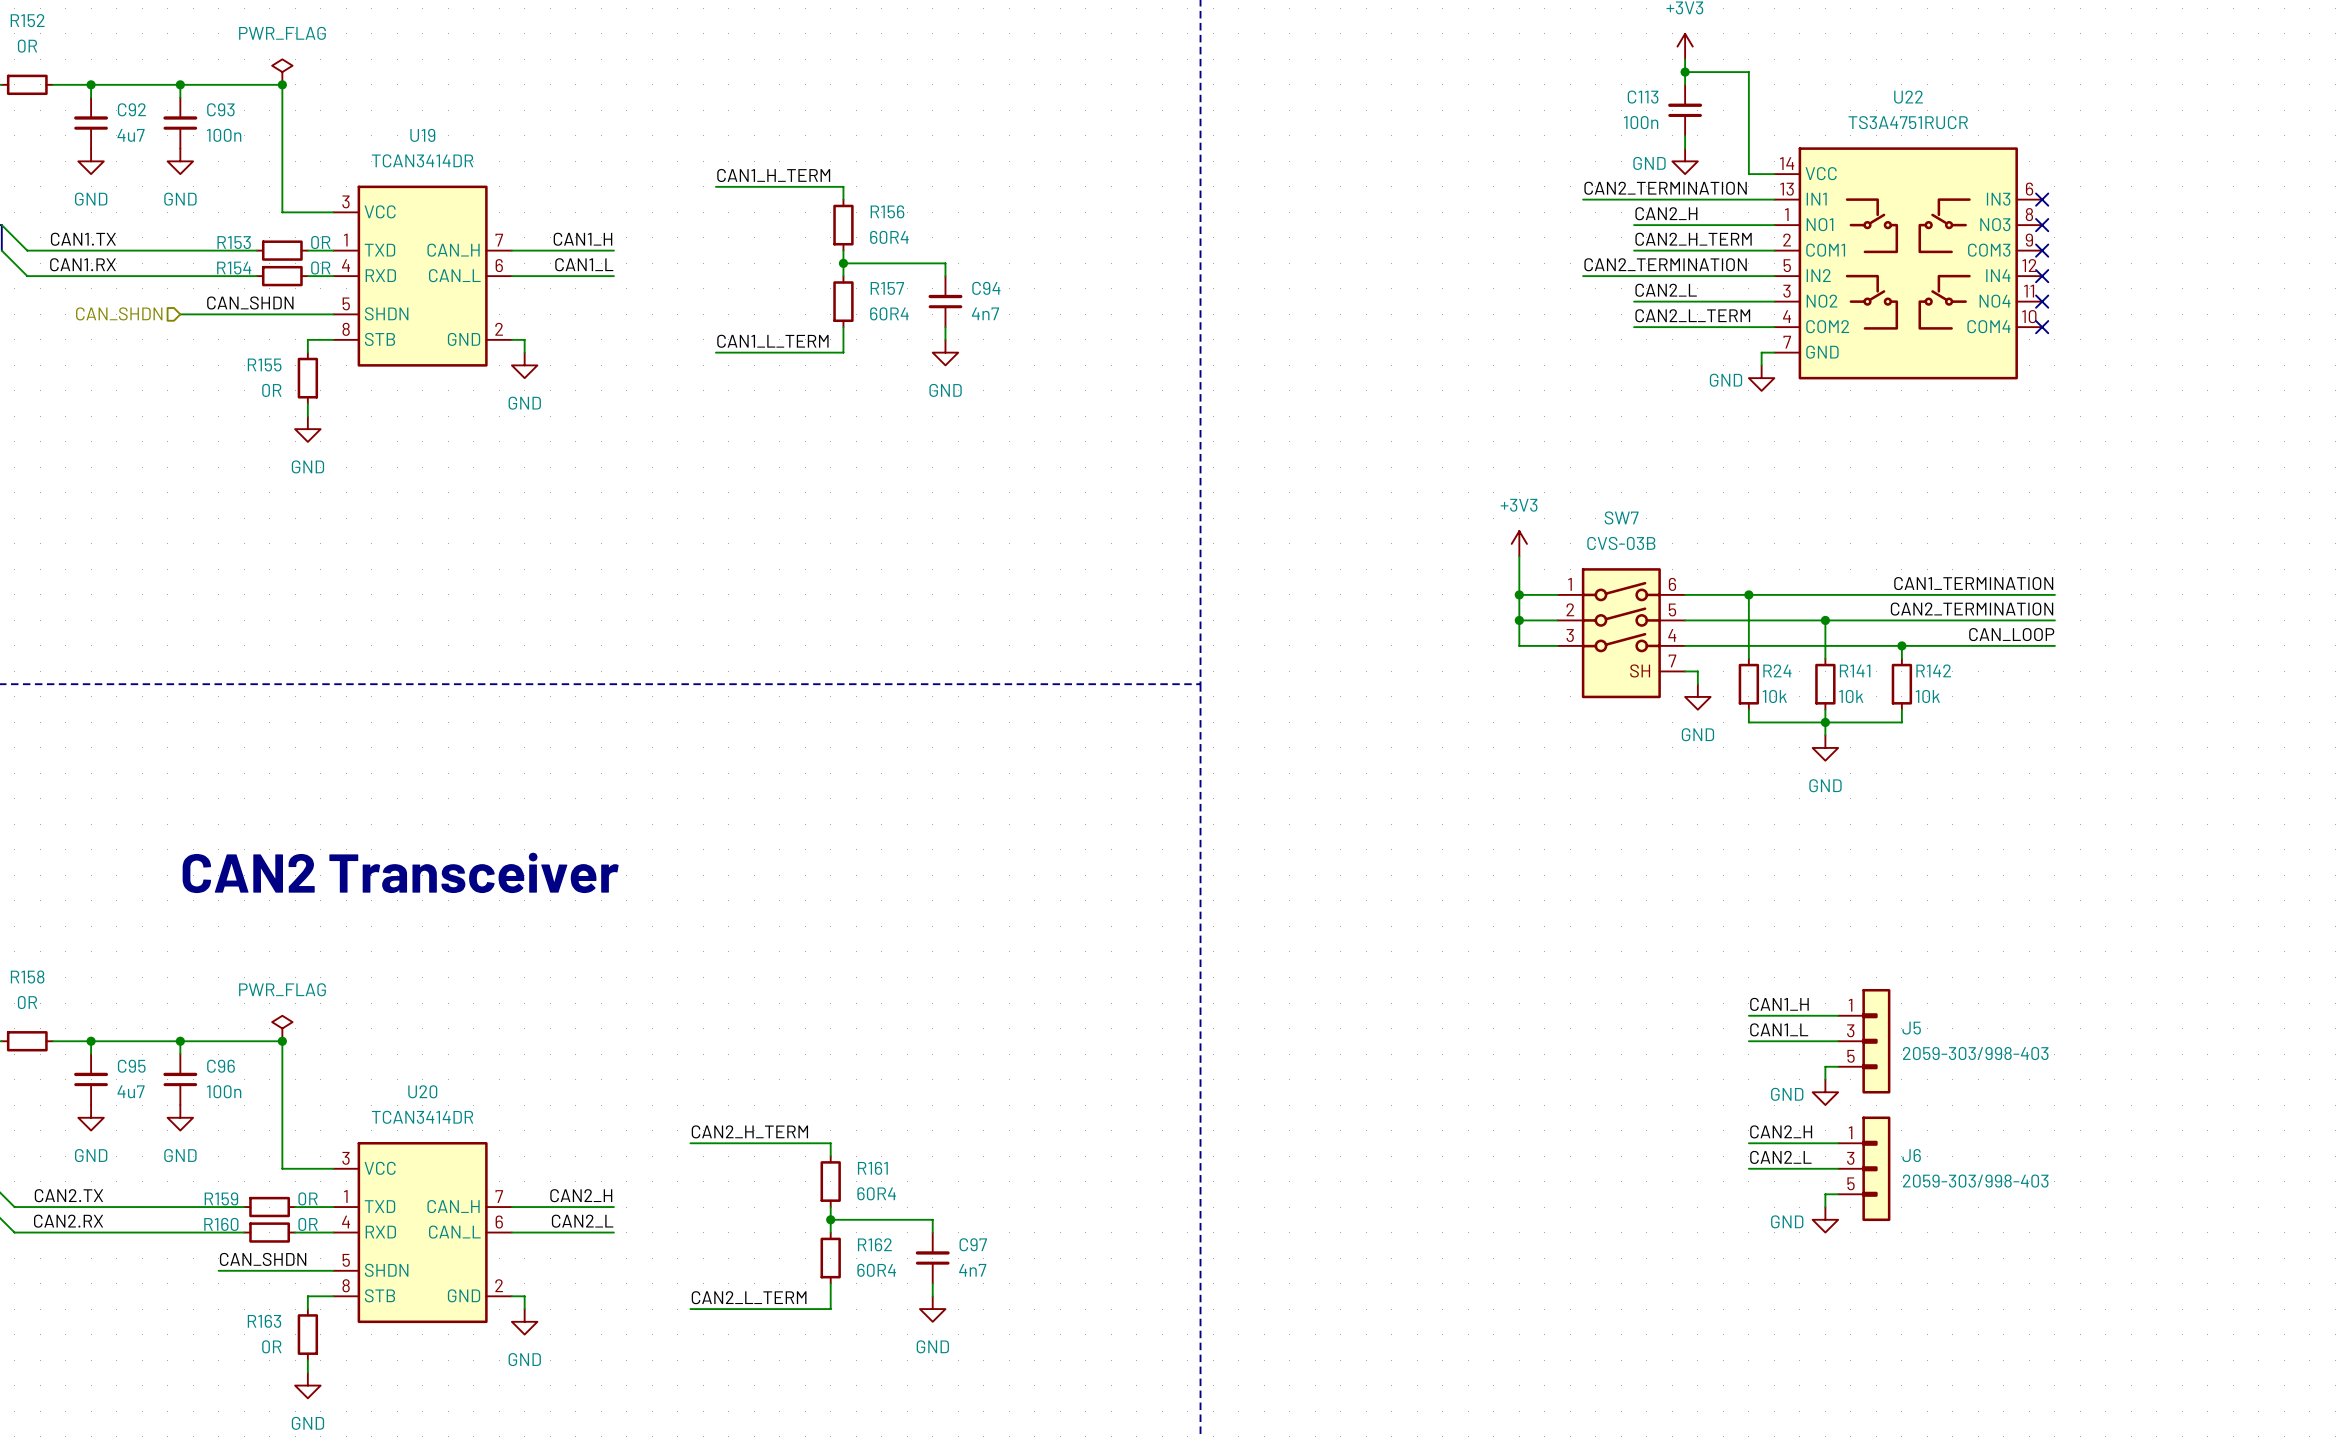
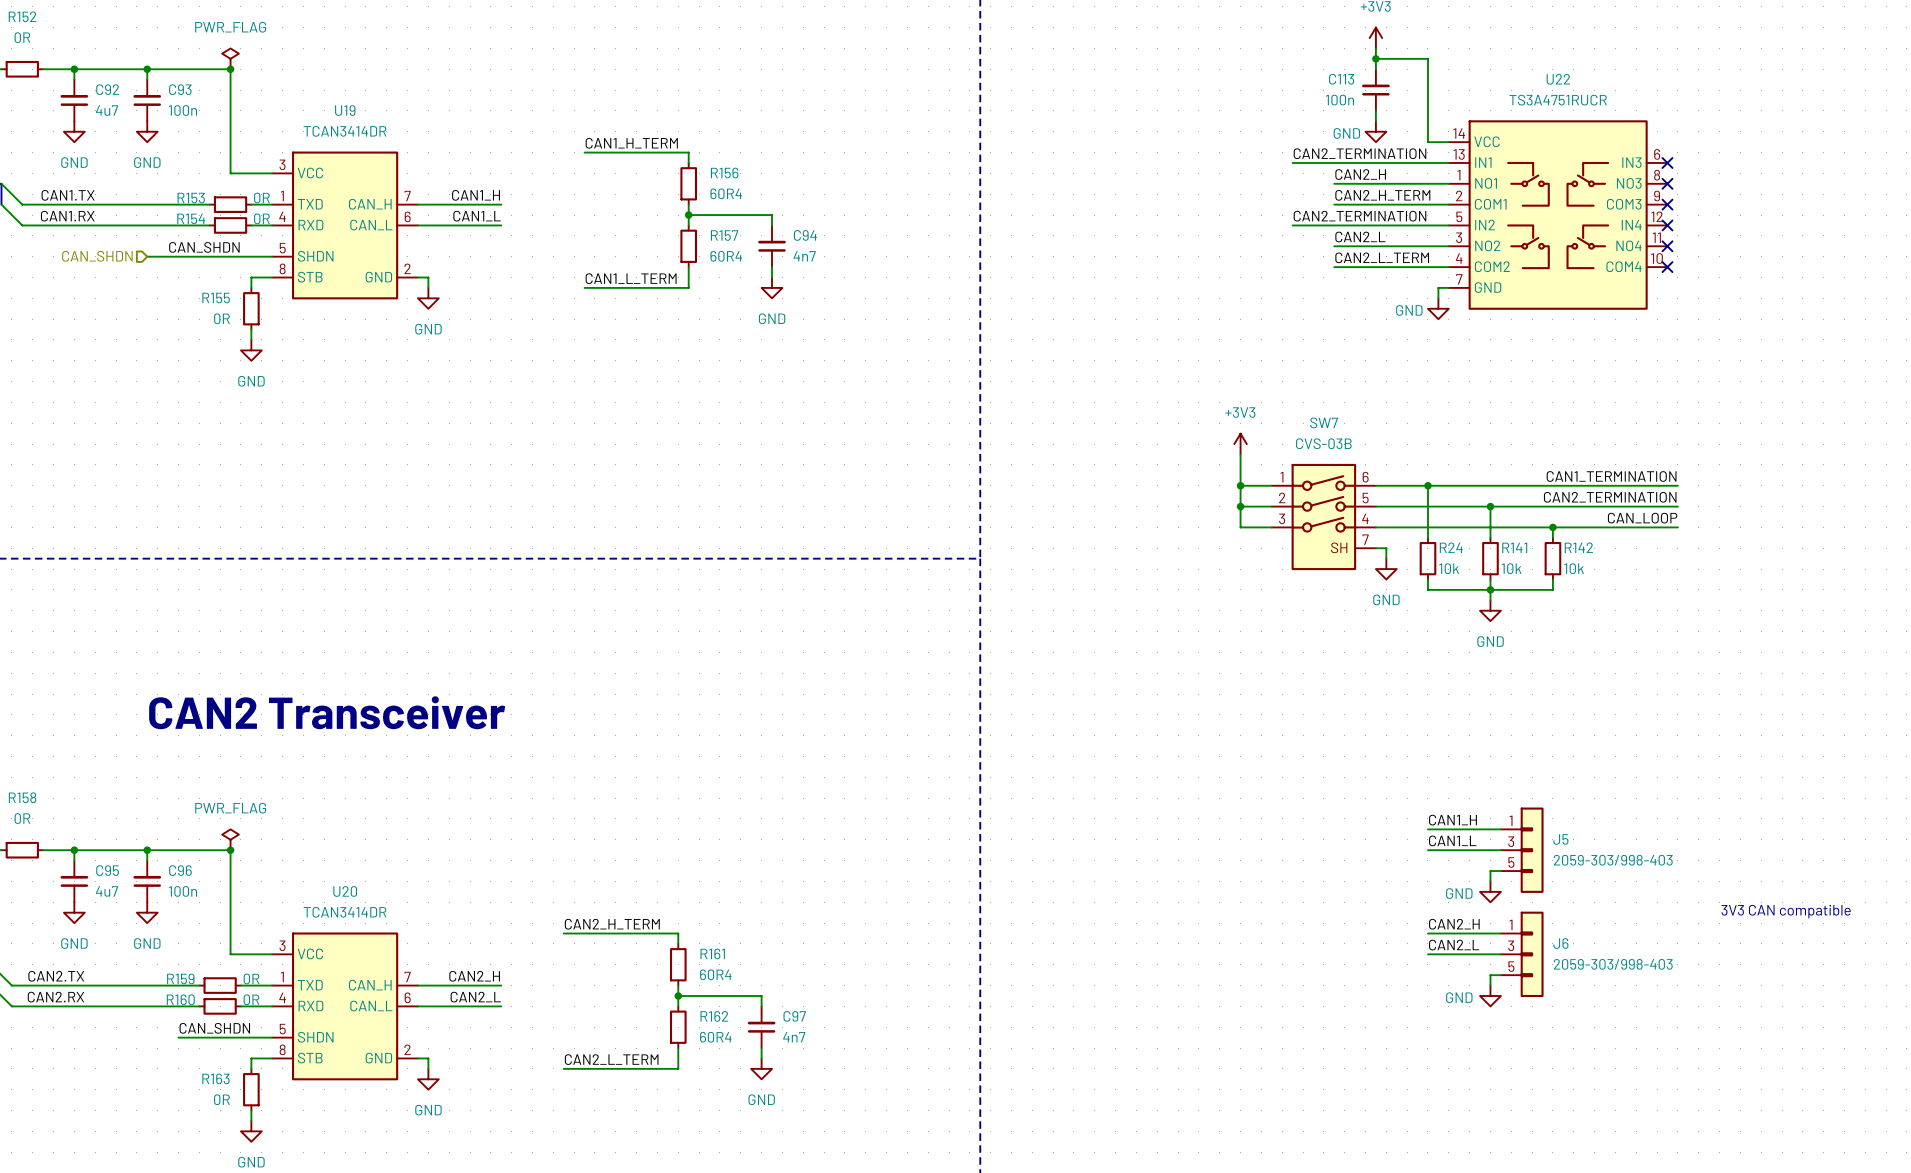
text: none -> 3V3 CAN compatible (1786, 911)

